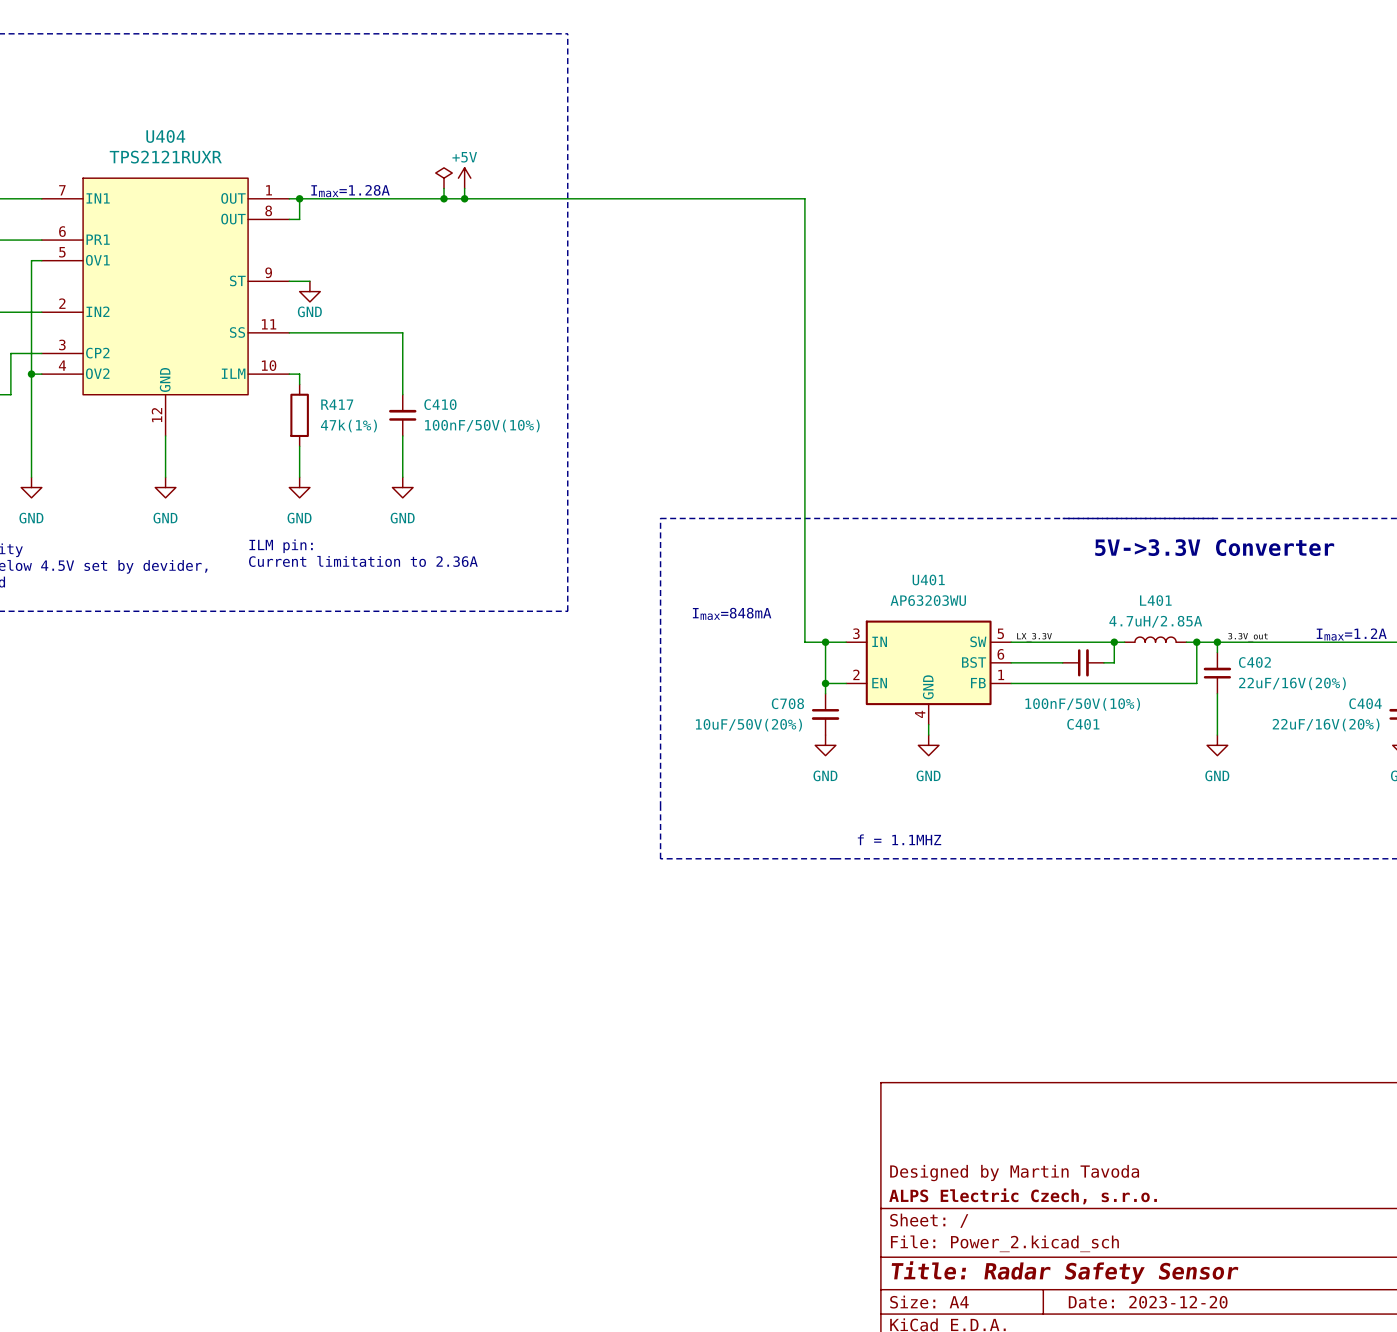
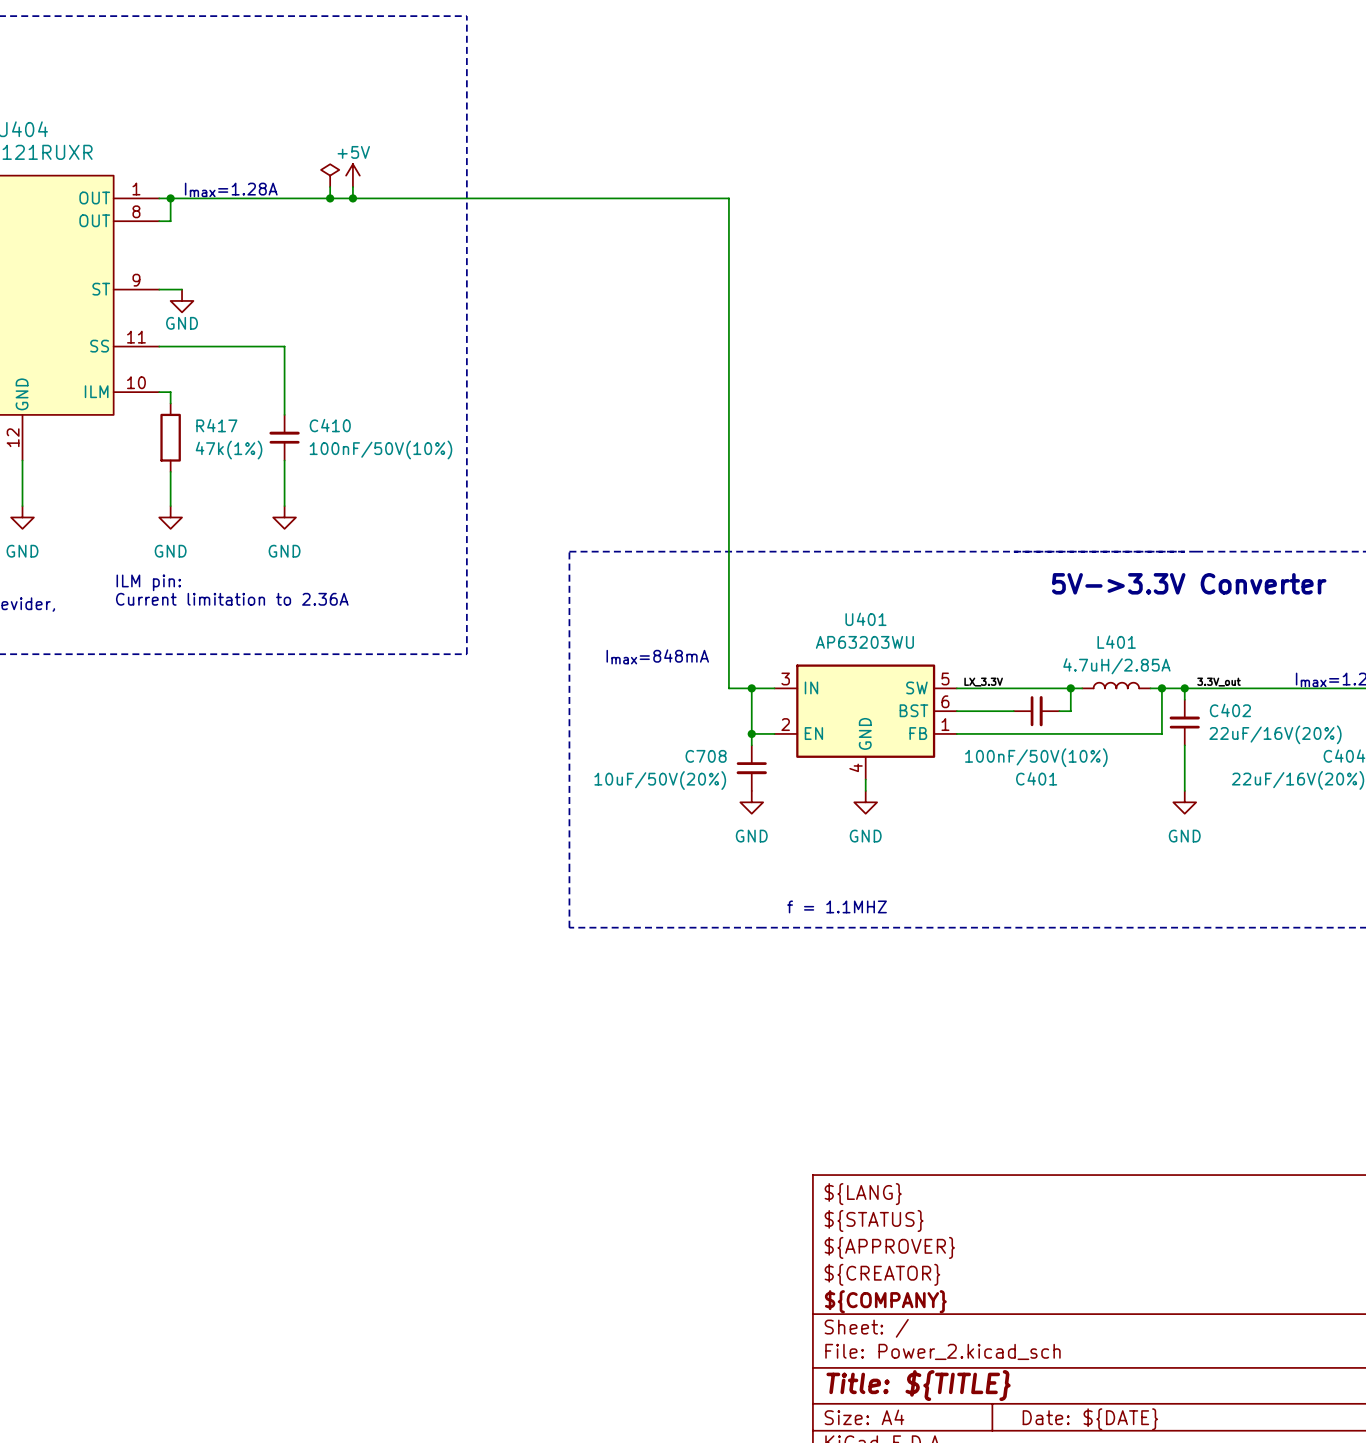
title block: none -> ${LANG} (863, 1194)
title block: none -> ${STATUS} (874, 1220)
title block: none -> ${APPROVER} (889, 1247)
title block: Designed by Martin Tavoda (1014, 1173) -> ${CREATOR} (882, 1274)
title block: ALPS Electric Czech, s.r.o. (1023, 1196) -> ${COMPANY} (885, 1301)
title block: Title: Radar Safety Sensor (1065, 1272) -> Title: ${TITLE} (918, 1385)
title block: Date: 2023-12-20 (1148, 1302) -> Date: ${DATE} (1090, 1419)

